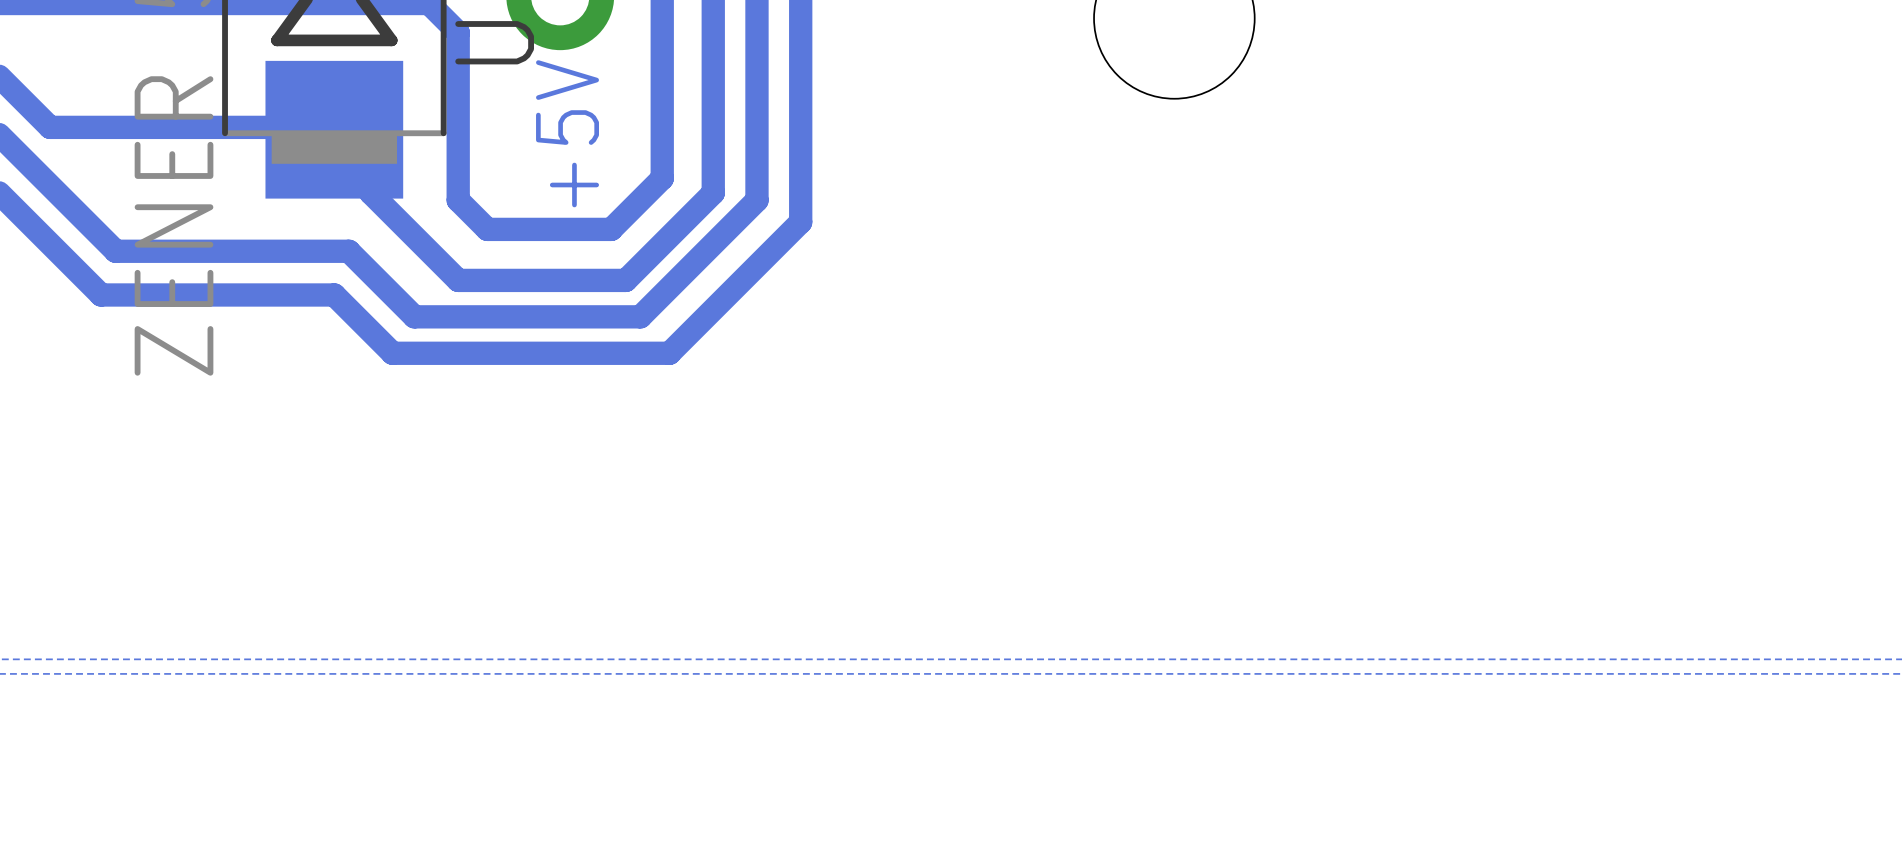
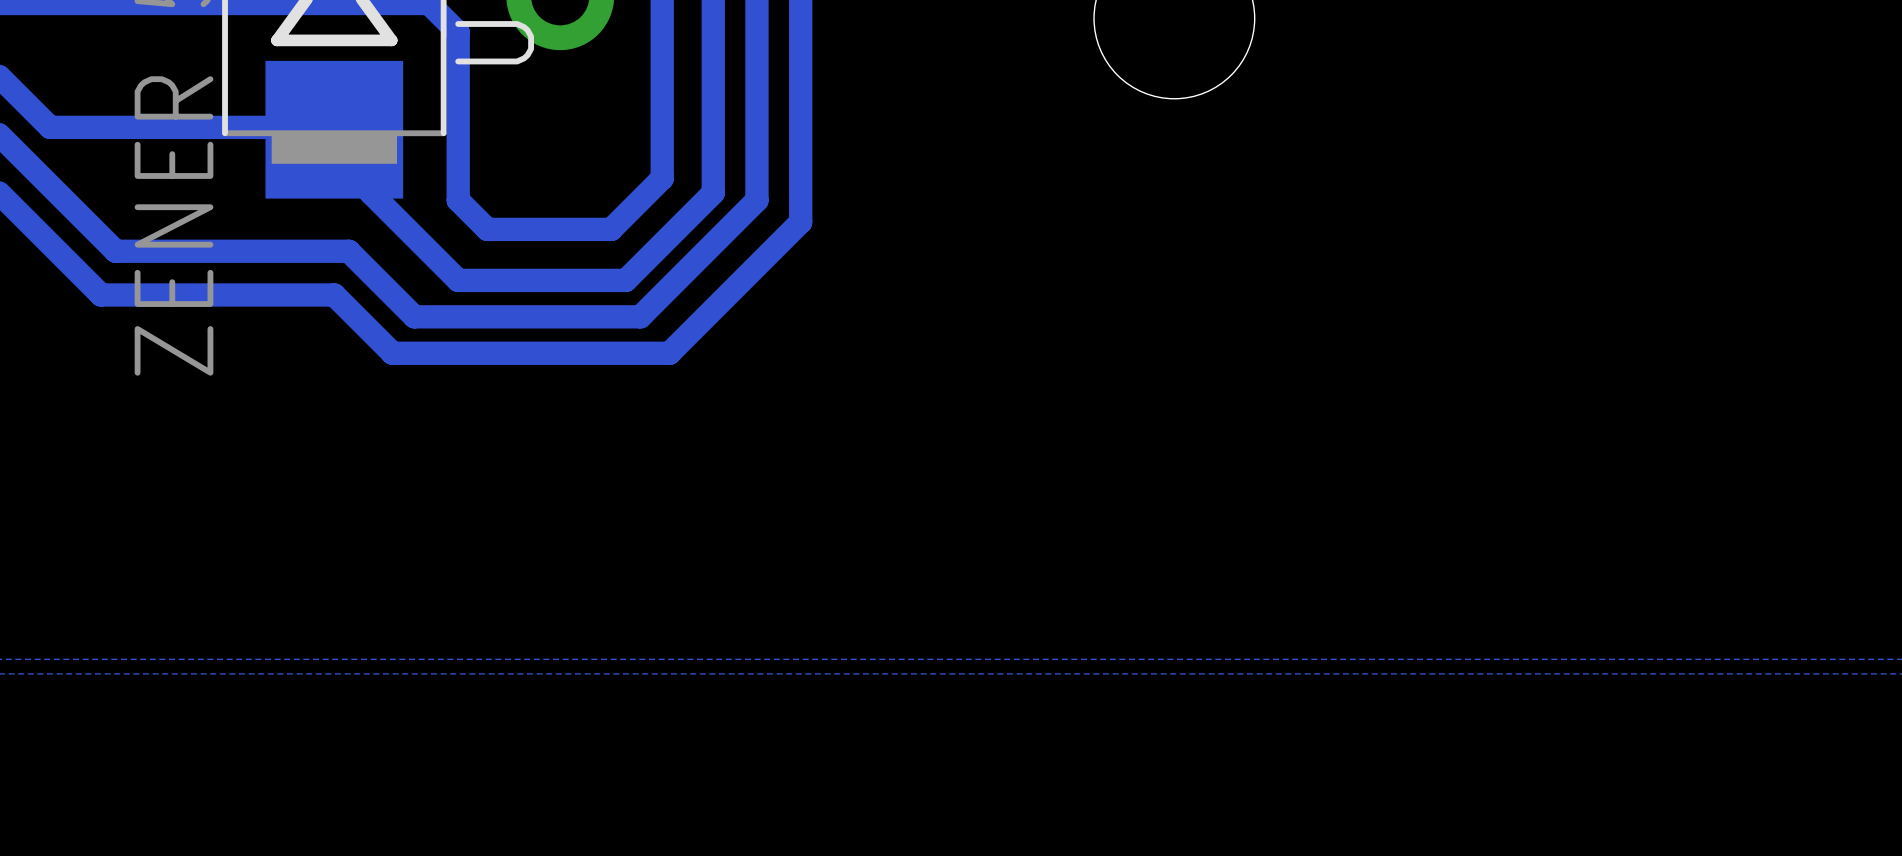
text: +5V (567, 133) -> none

